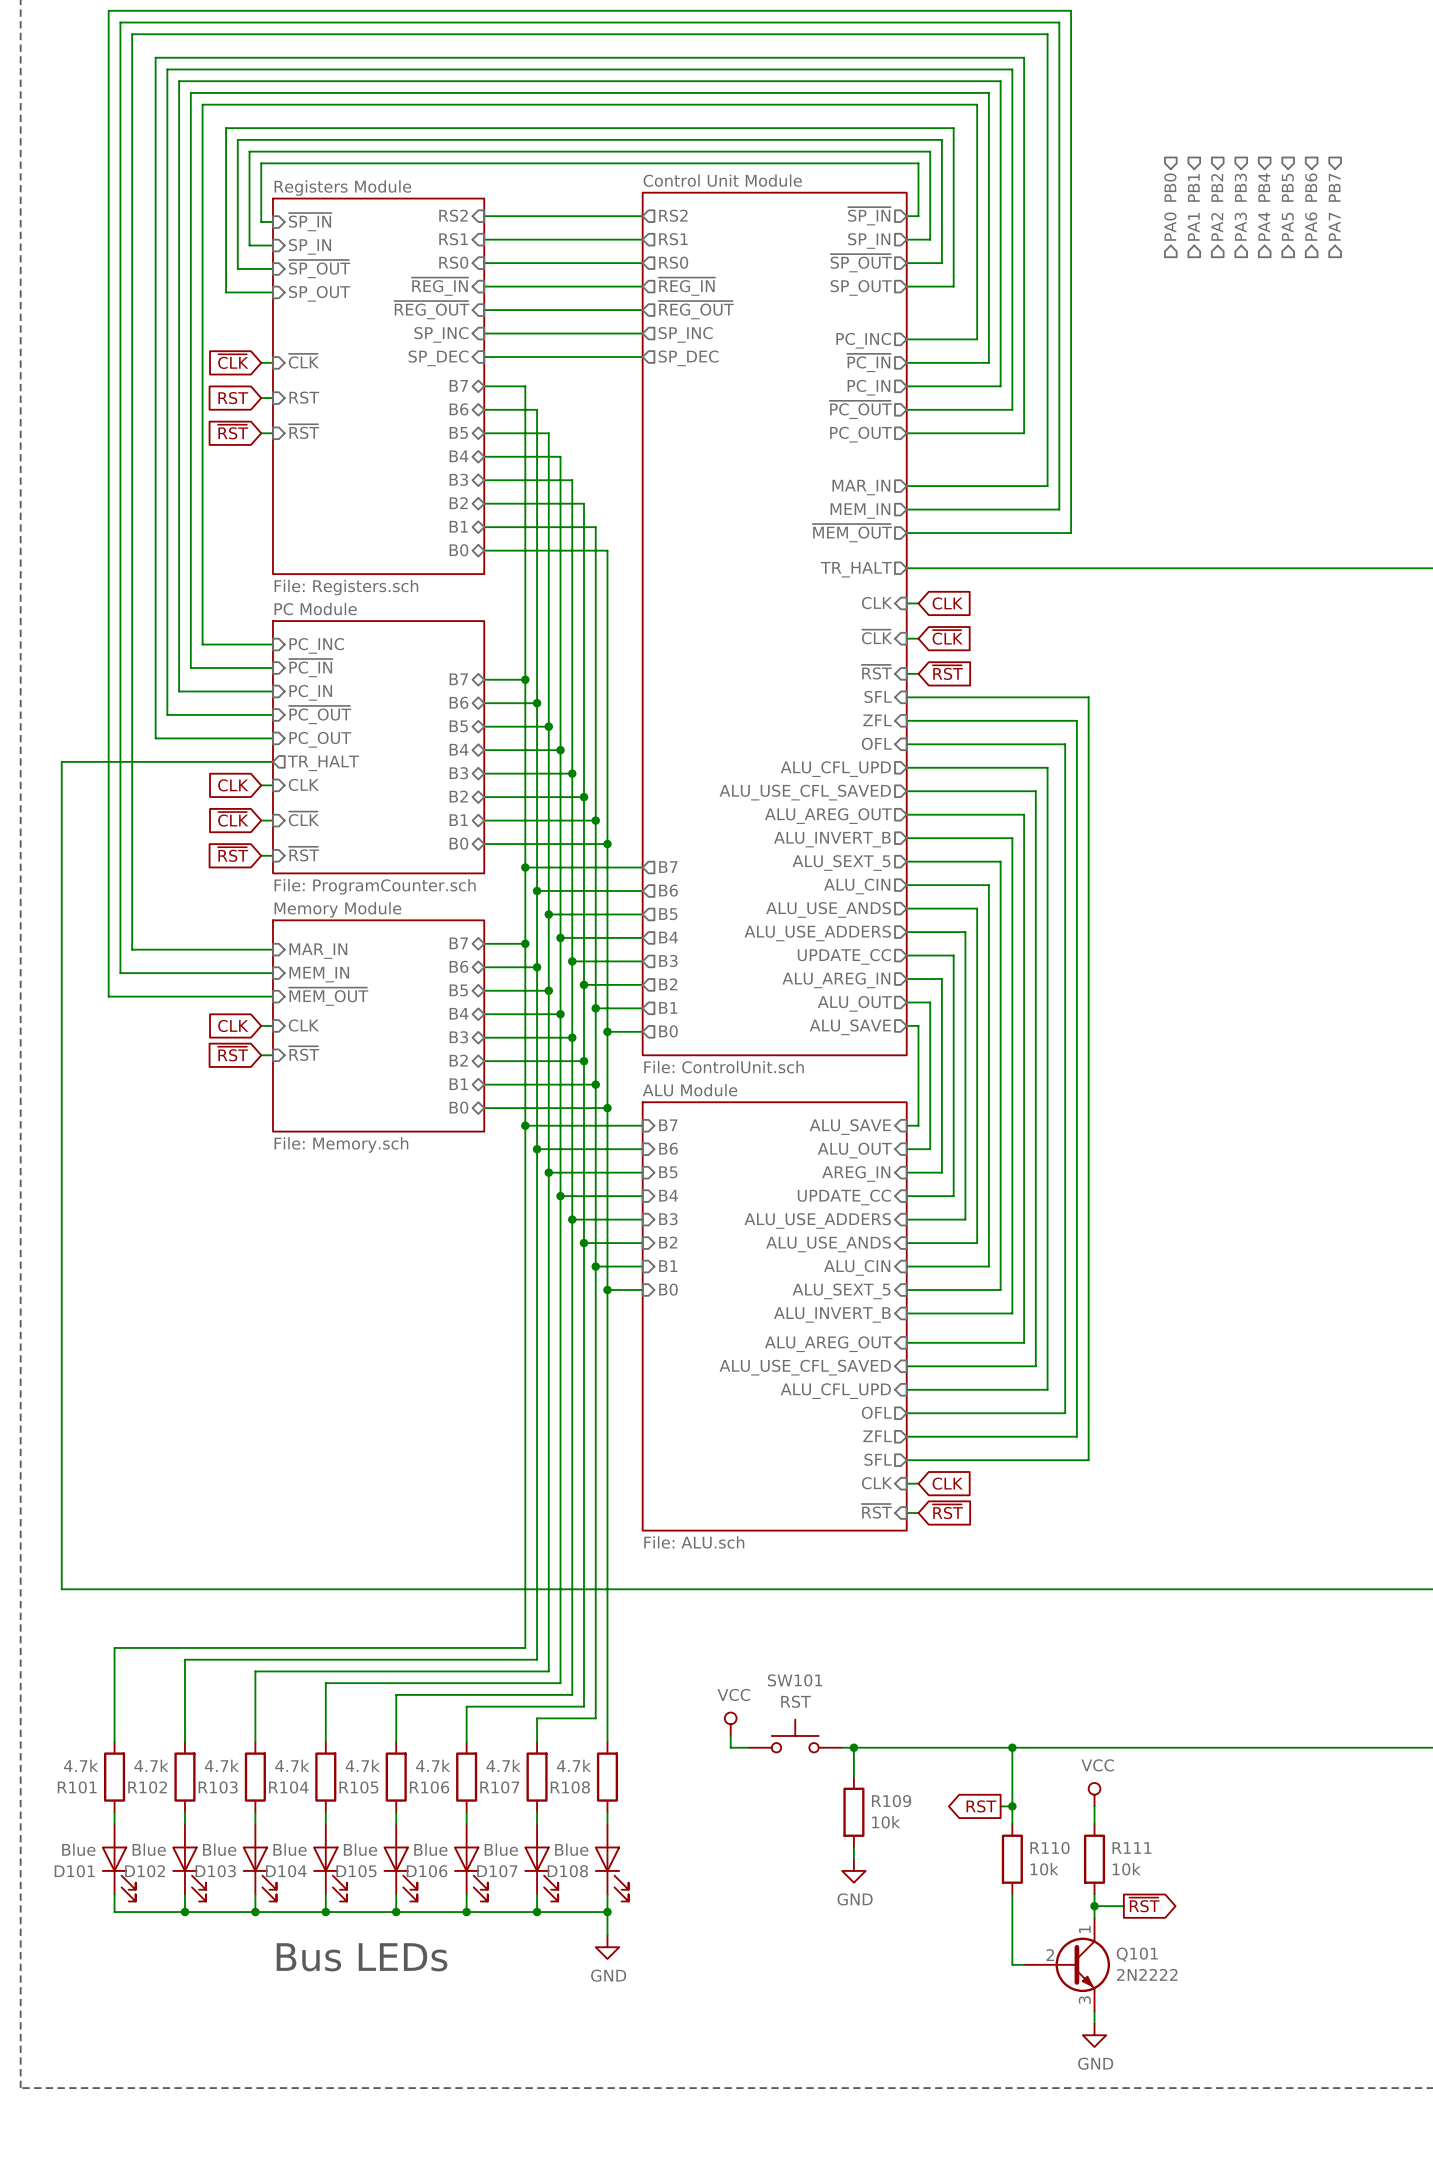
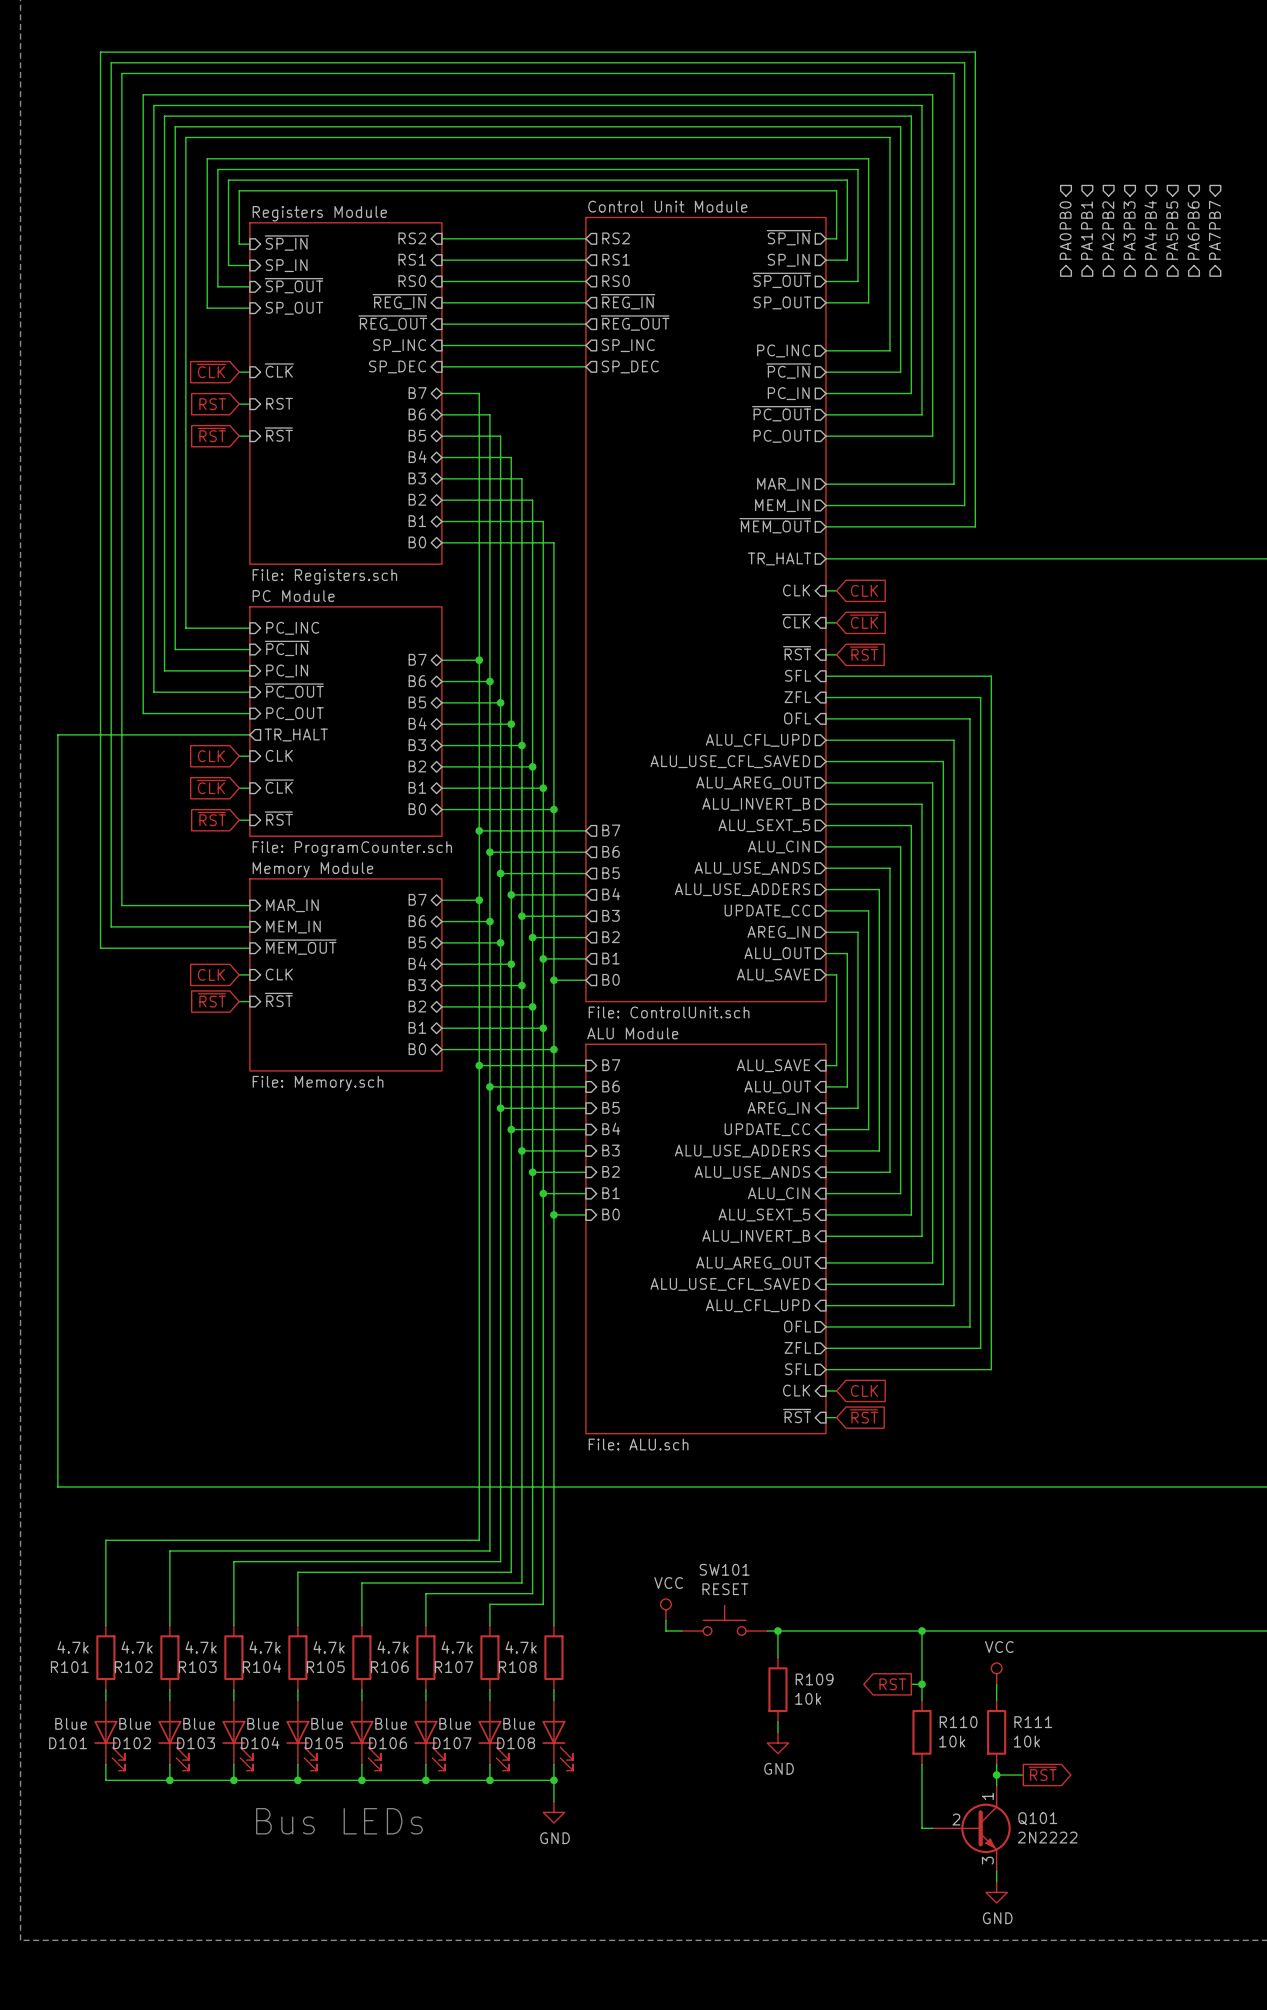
sheet pin: ALU_AREG_IN (836, 980) -> AREG_IN (778, 932)
SW101 value: RST (796, 1701) -> RESET (725, 1589)

